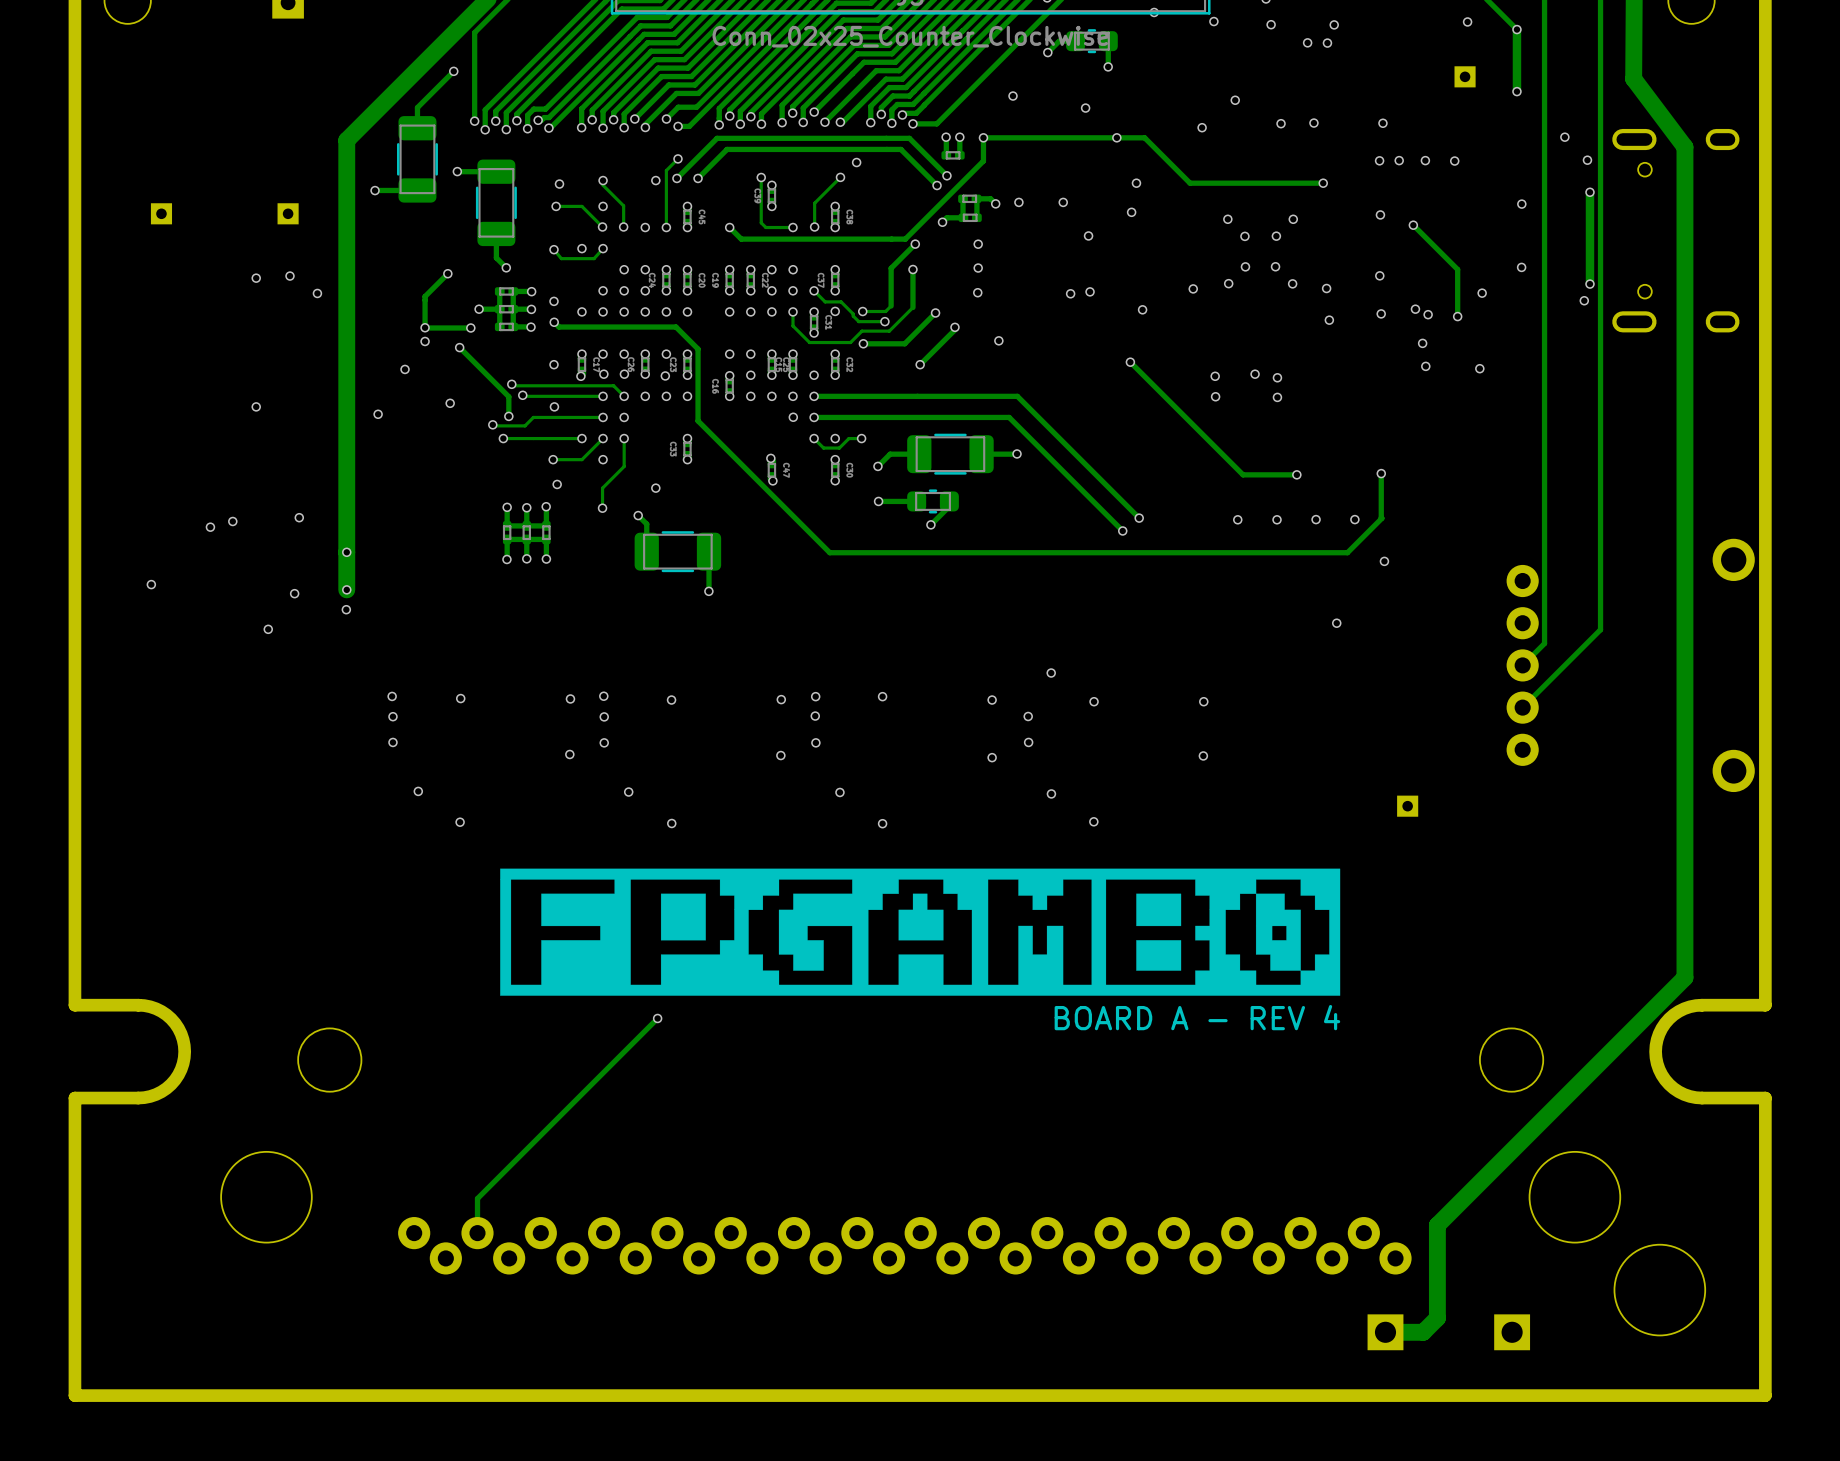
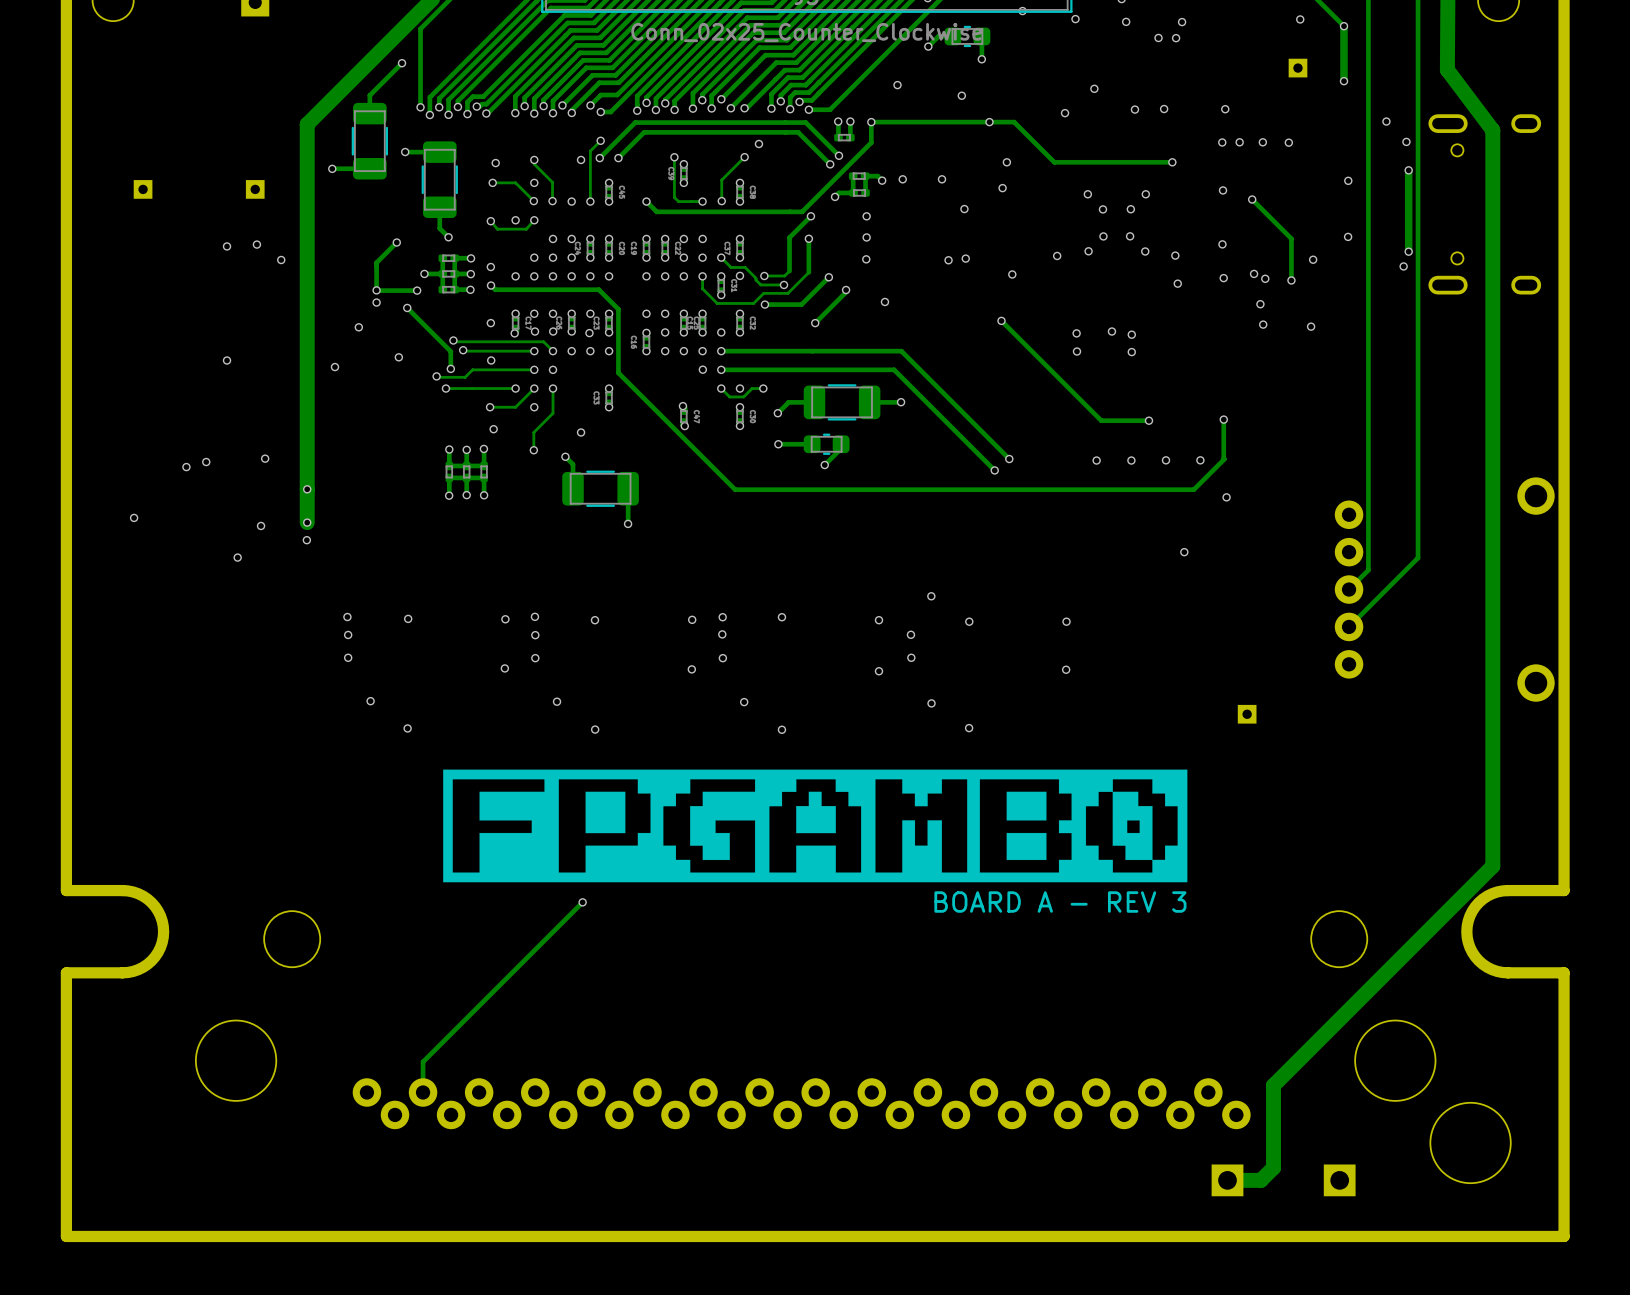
text: BOARD A - REV 4 (1197, 1017) -> BOARD A - REV 3 (1060, 902)

